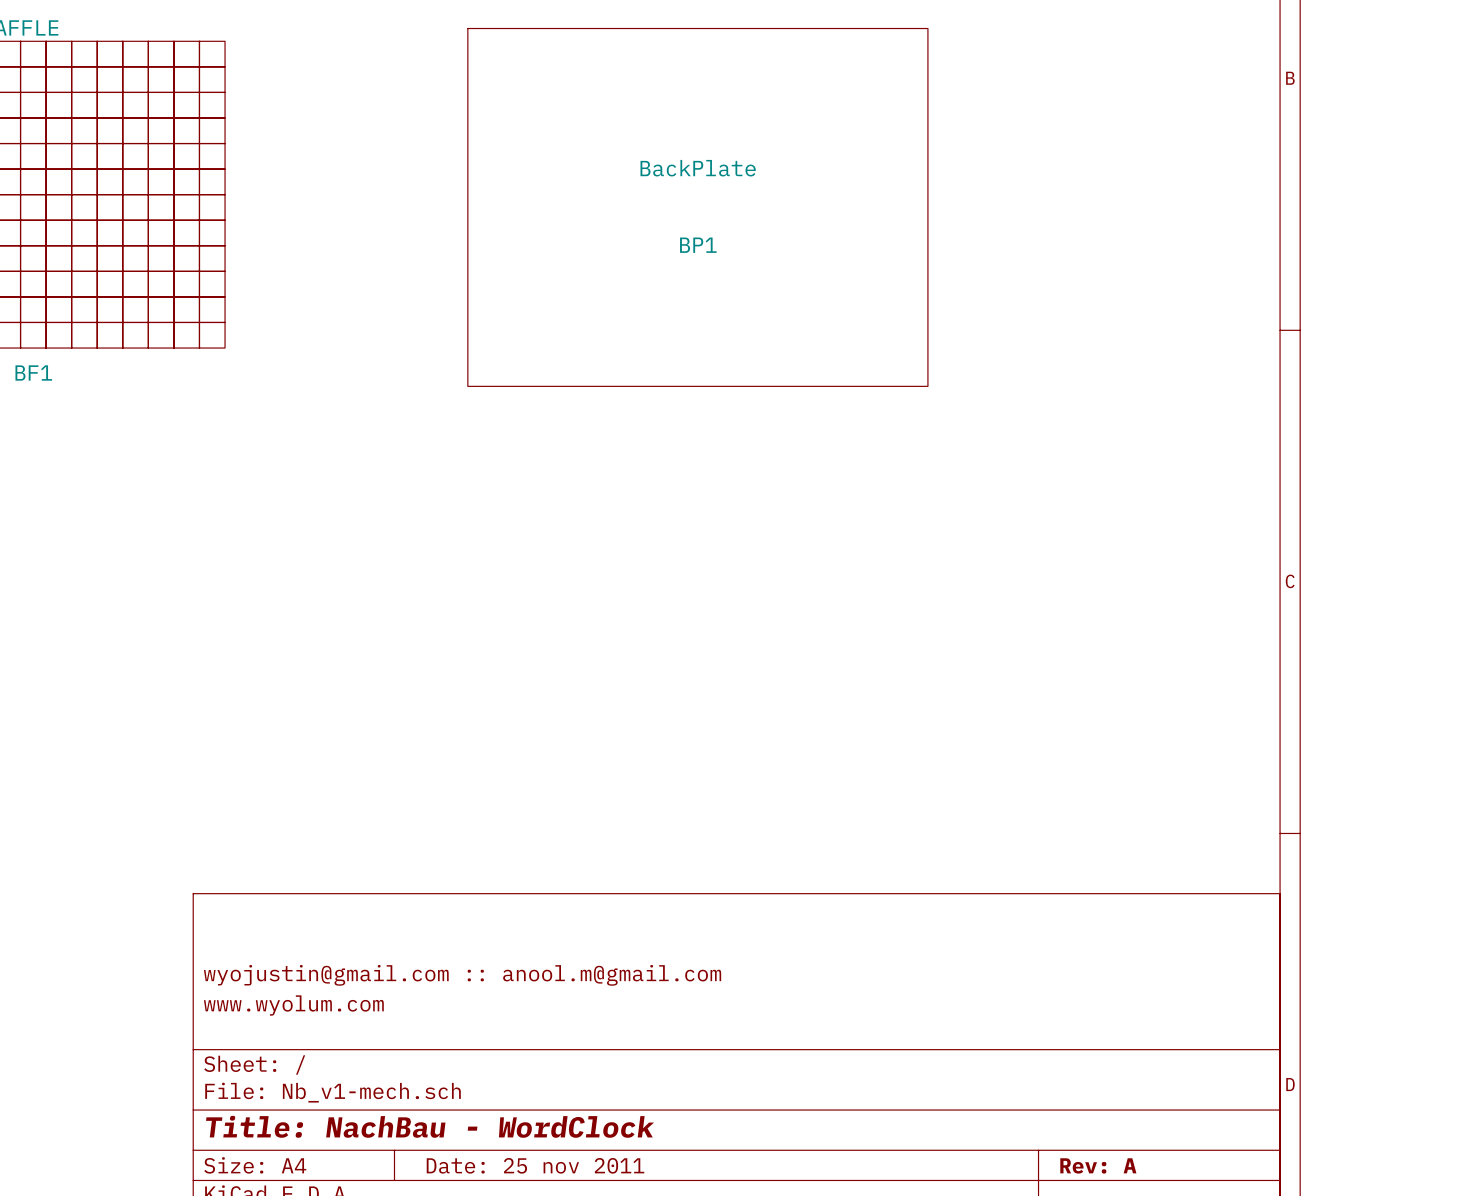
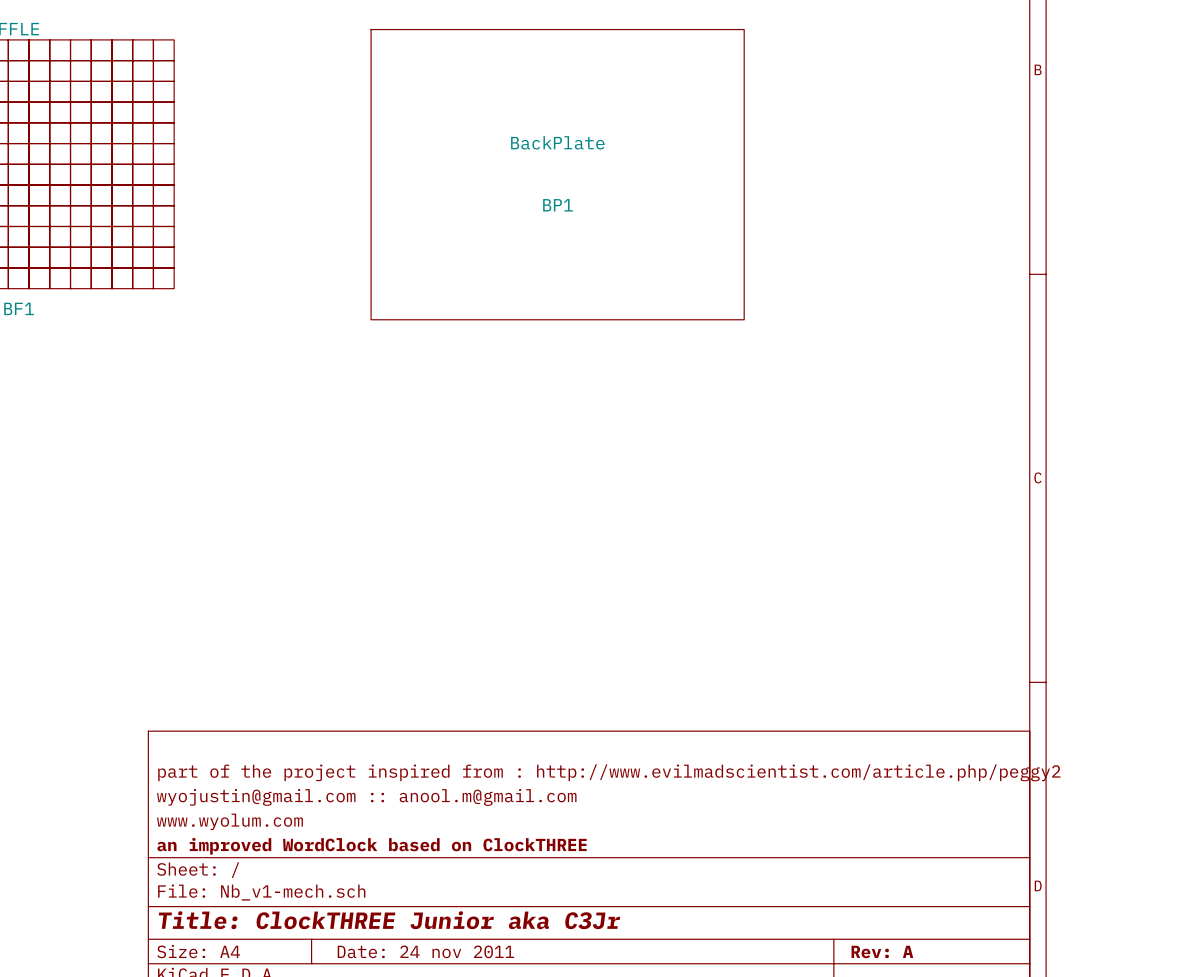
title block: none -> part of the project inspired from : http://www.evilmadscientist.com/article.php/peggy2 (609, 772)
title block: none -> an improved WordClock based on ClockTHREE (372, 846)
title block: Title: NachBau - WordClock (430, 1126) -> Title: ClockTHREE Junior aka C3Jr (389, 920)
title block: Date: 25 nov 2011 (535, 1165) -> Date: 24 nov 2011 (425, 951)

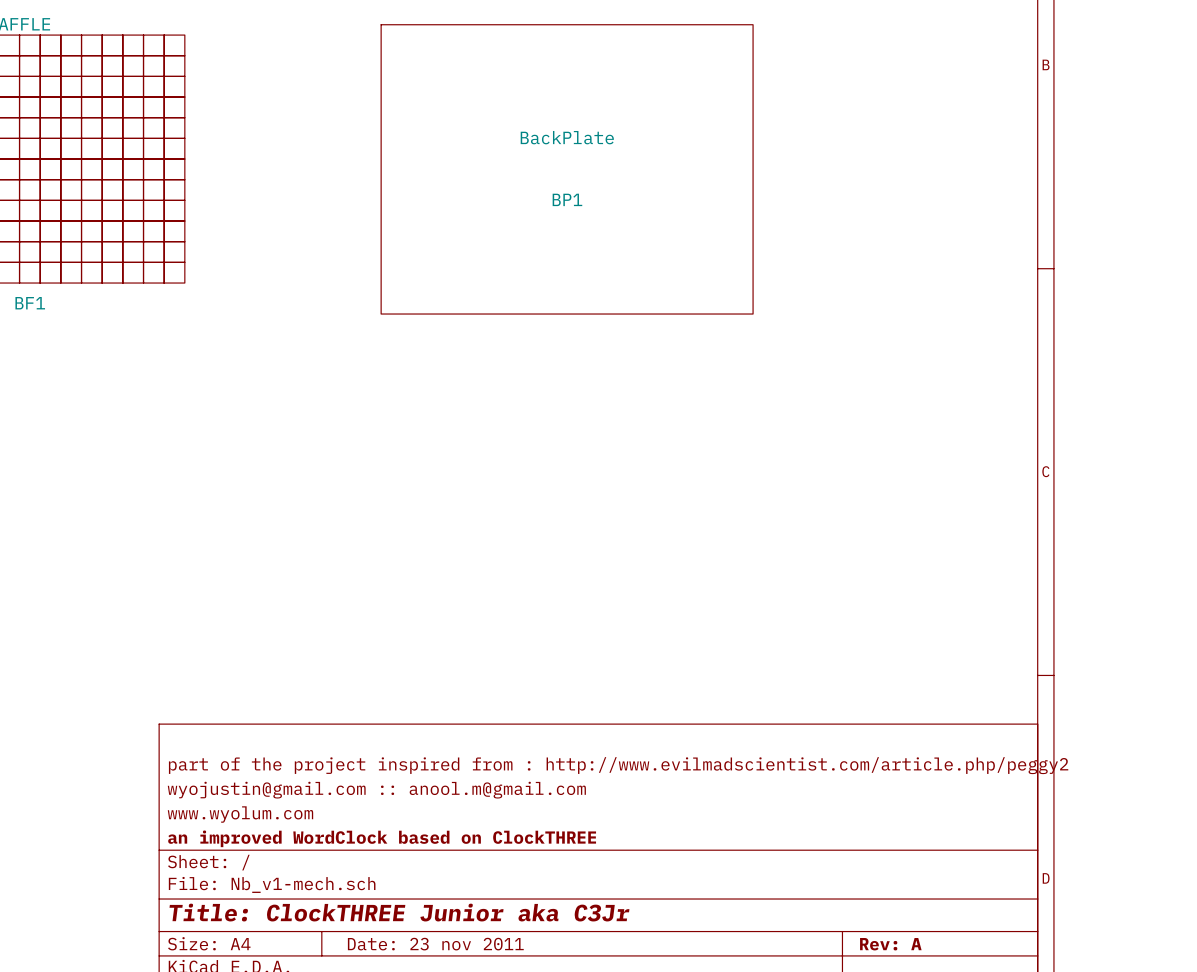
title block: Date: 24 nov 2011 (425, 951) -> Date: 23 nov 2011 (435, 944)

